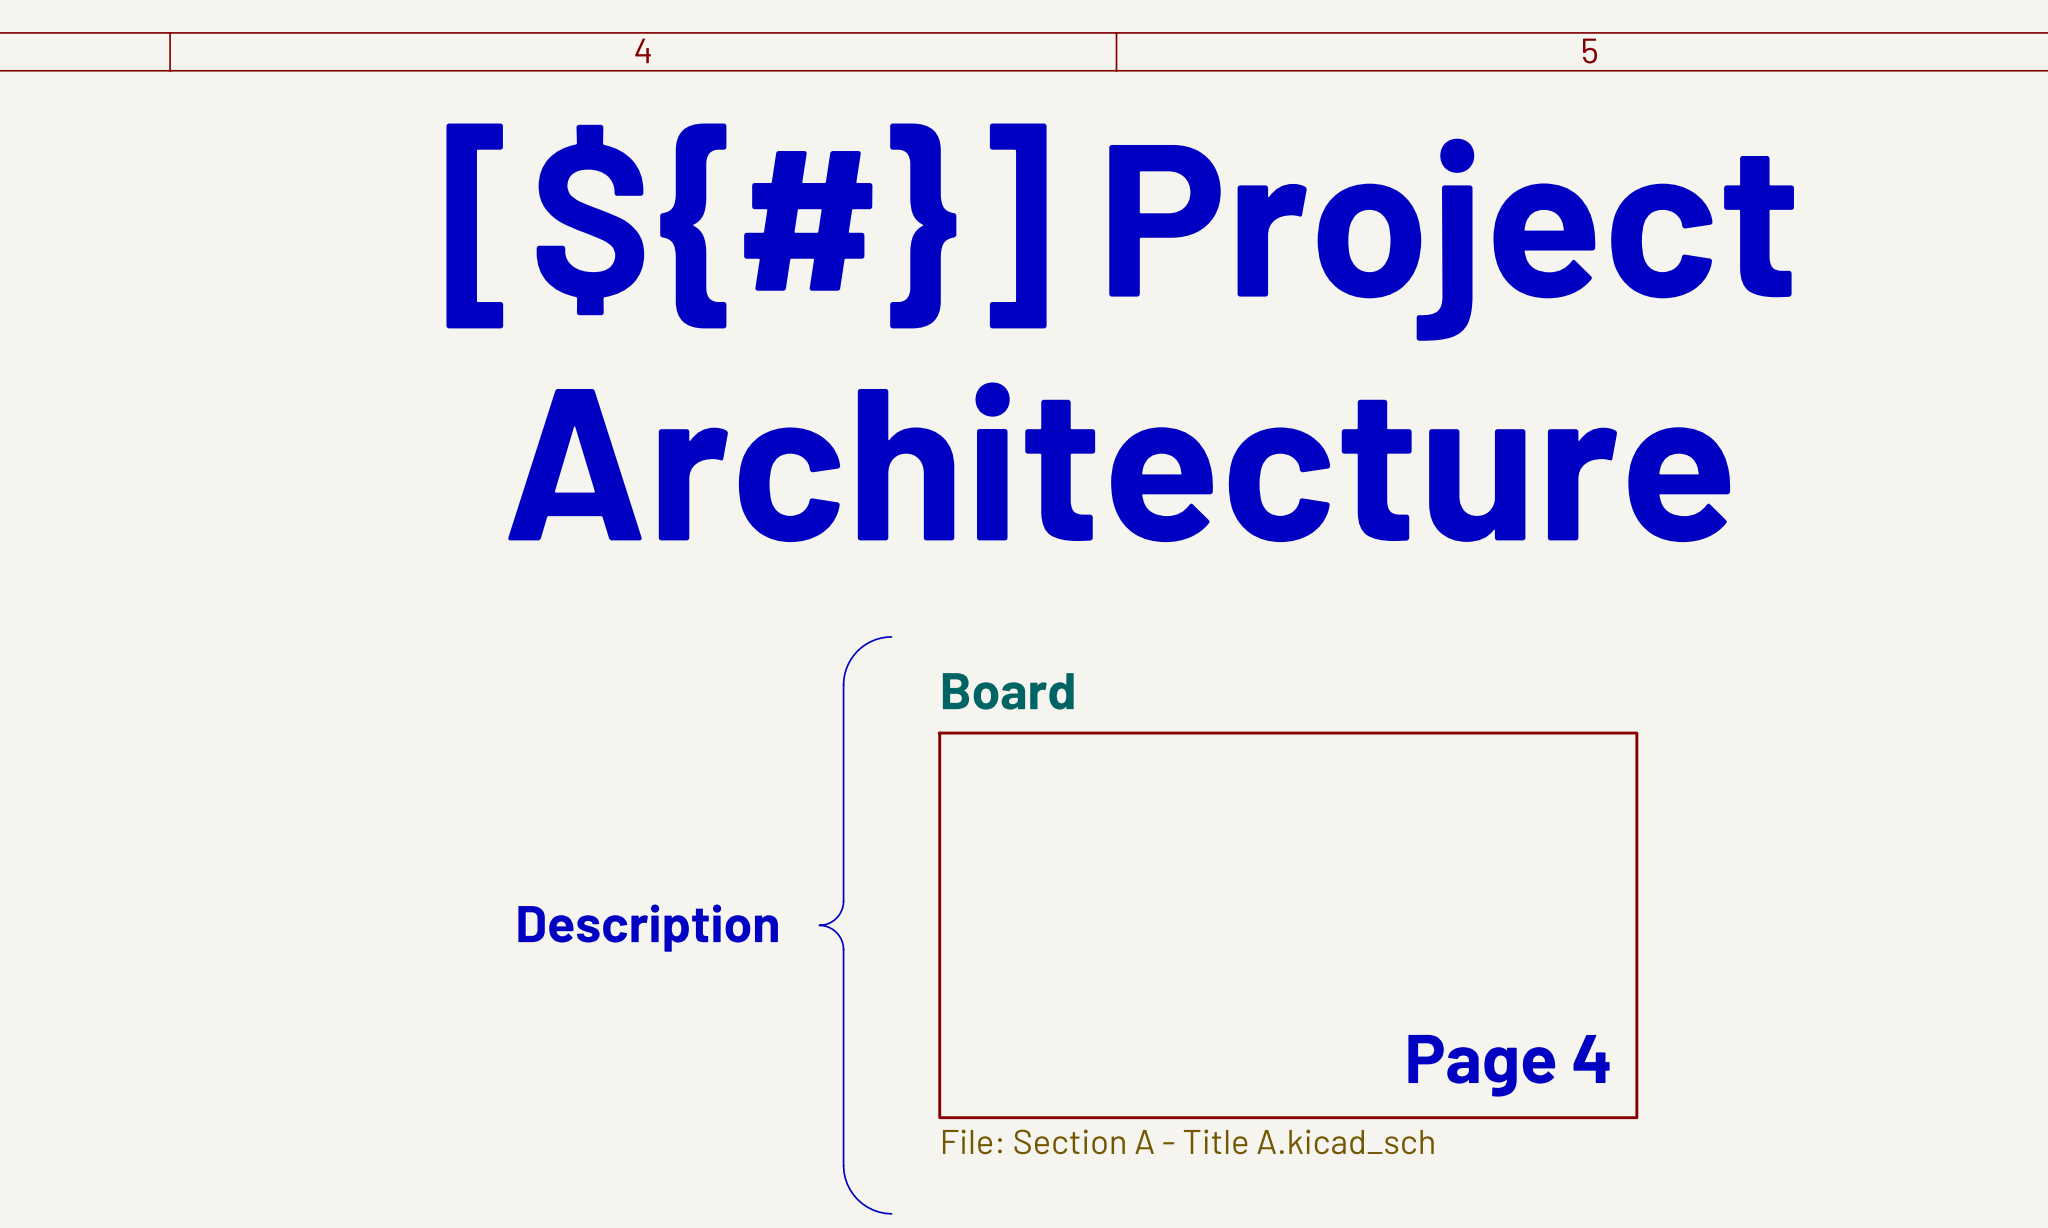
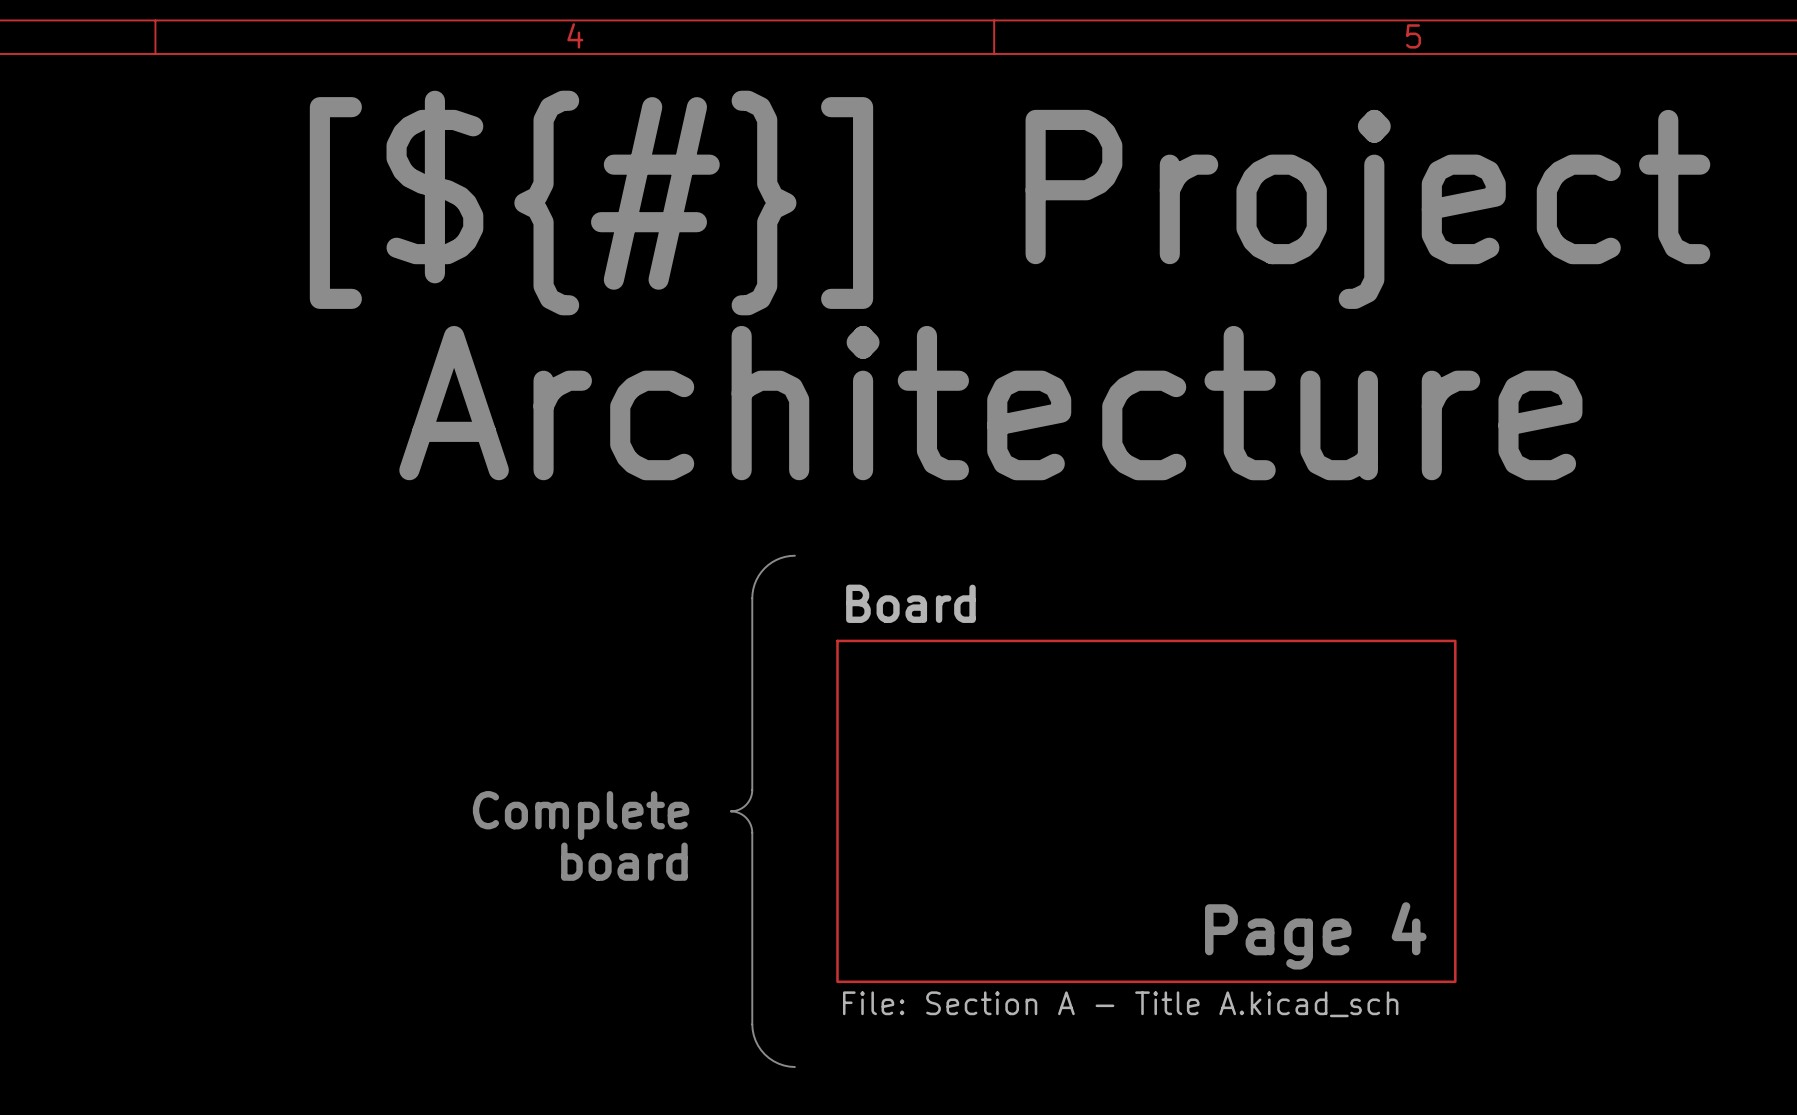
text: Description (648, 928) -> Complete (581, 815)
text: none -> board (624, 861)

